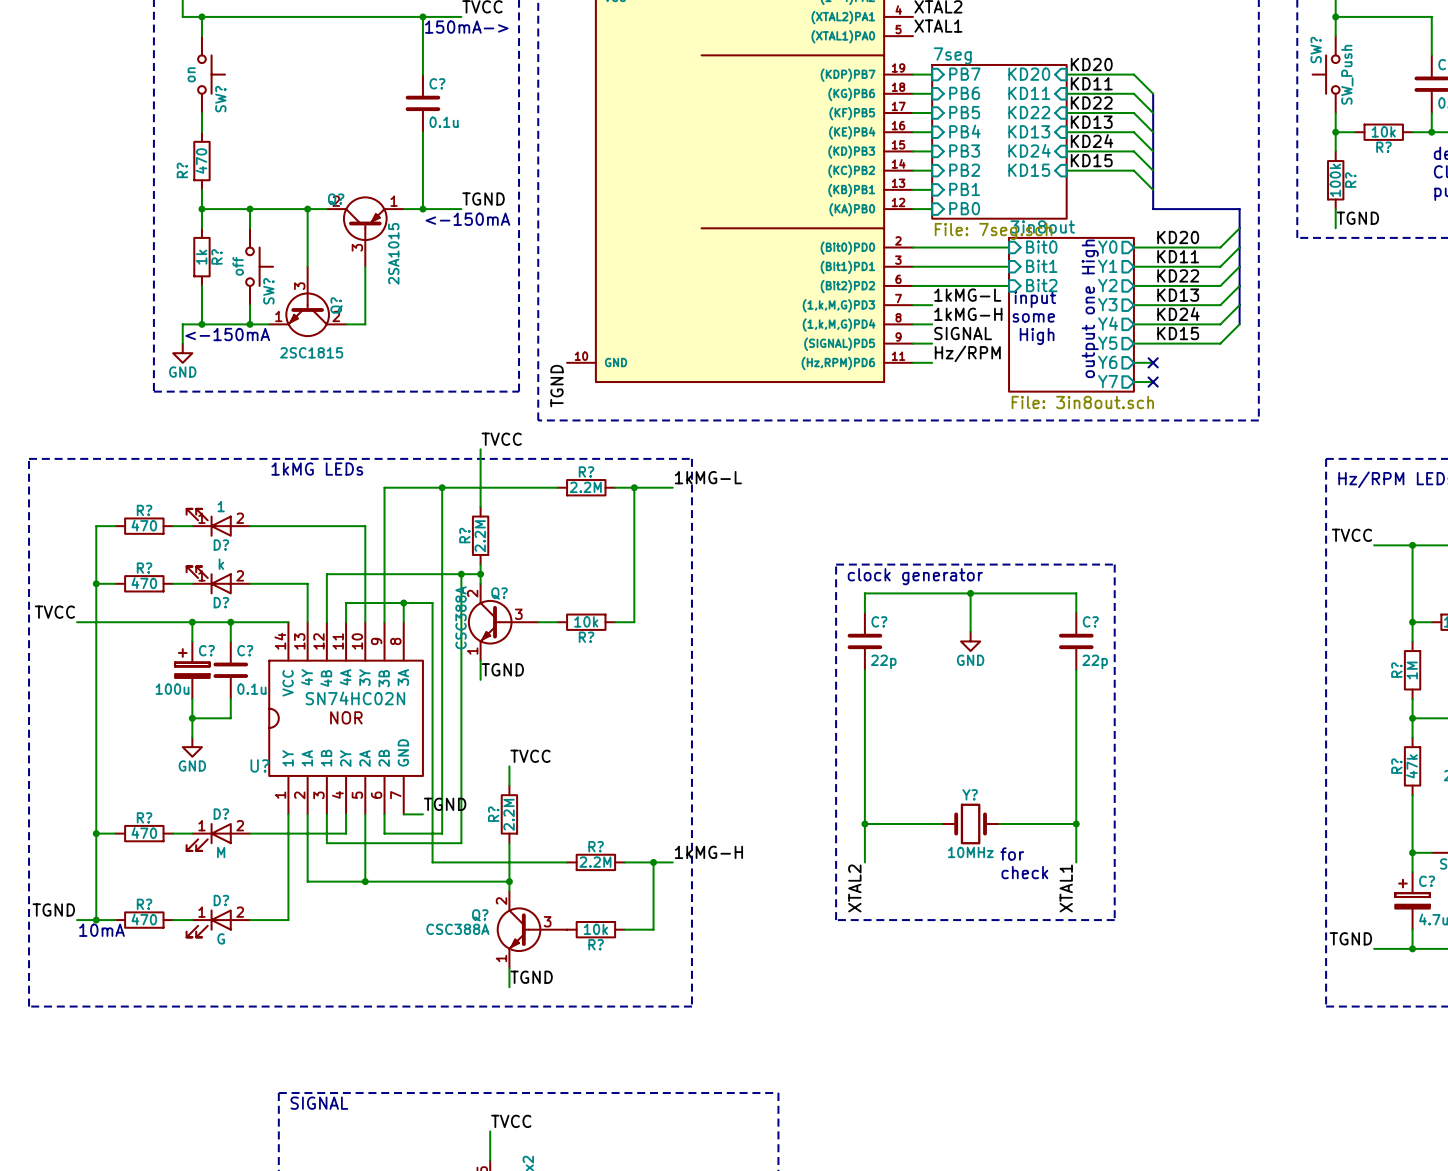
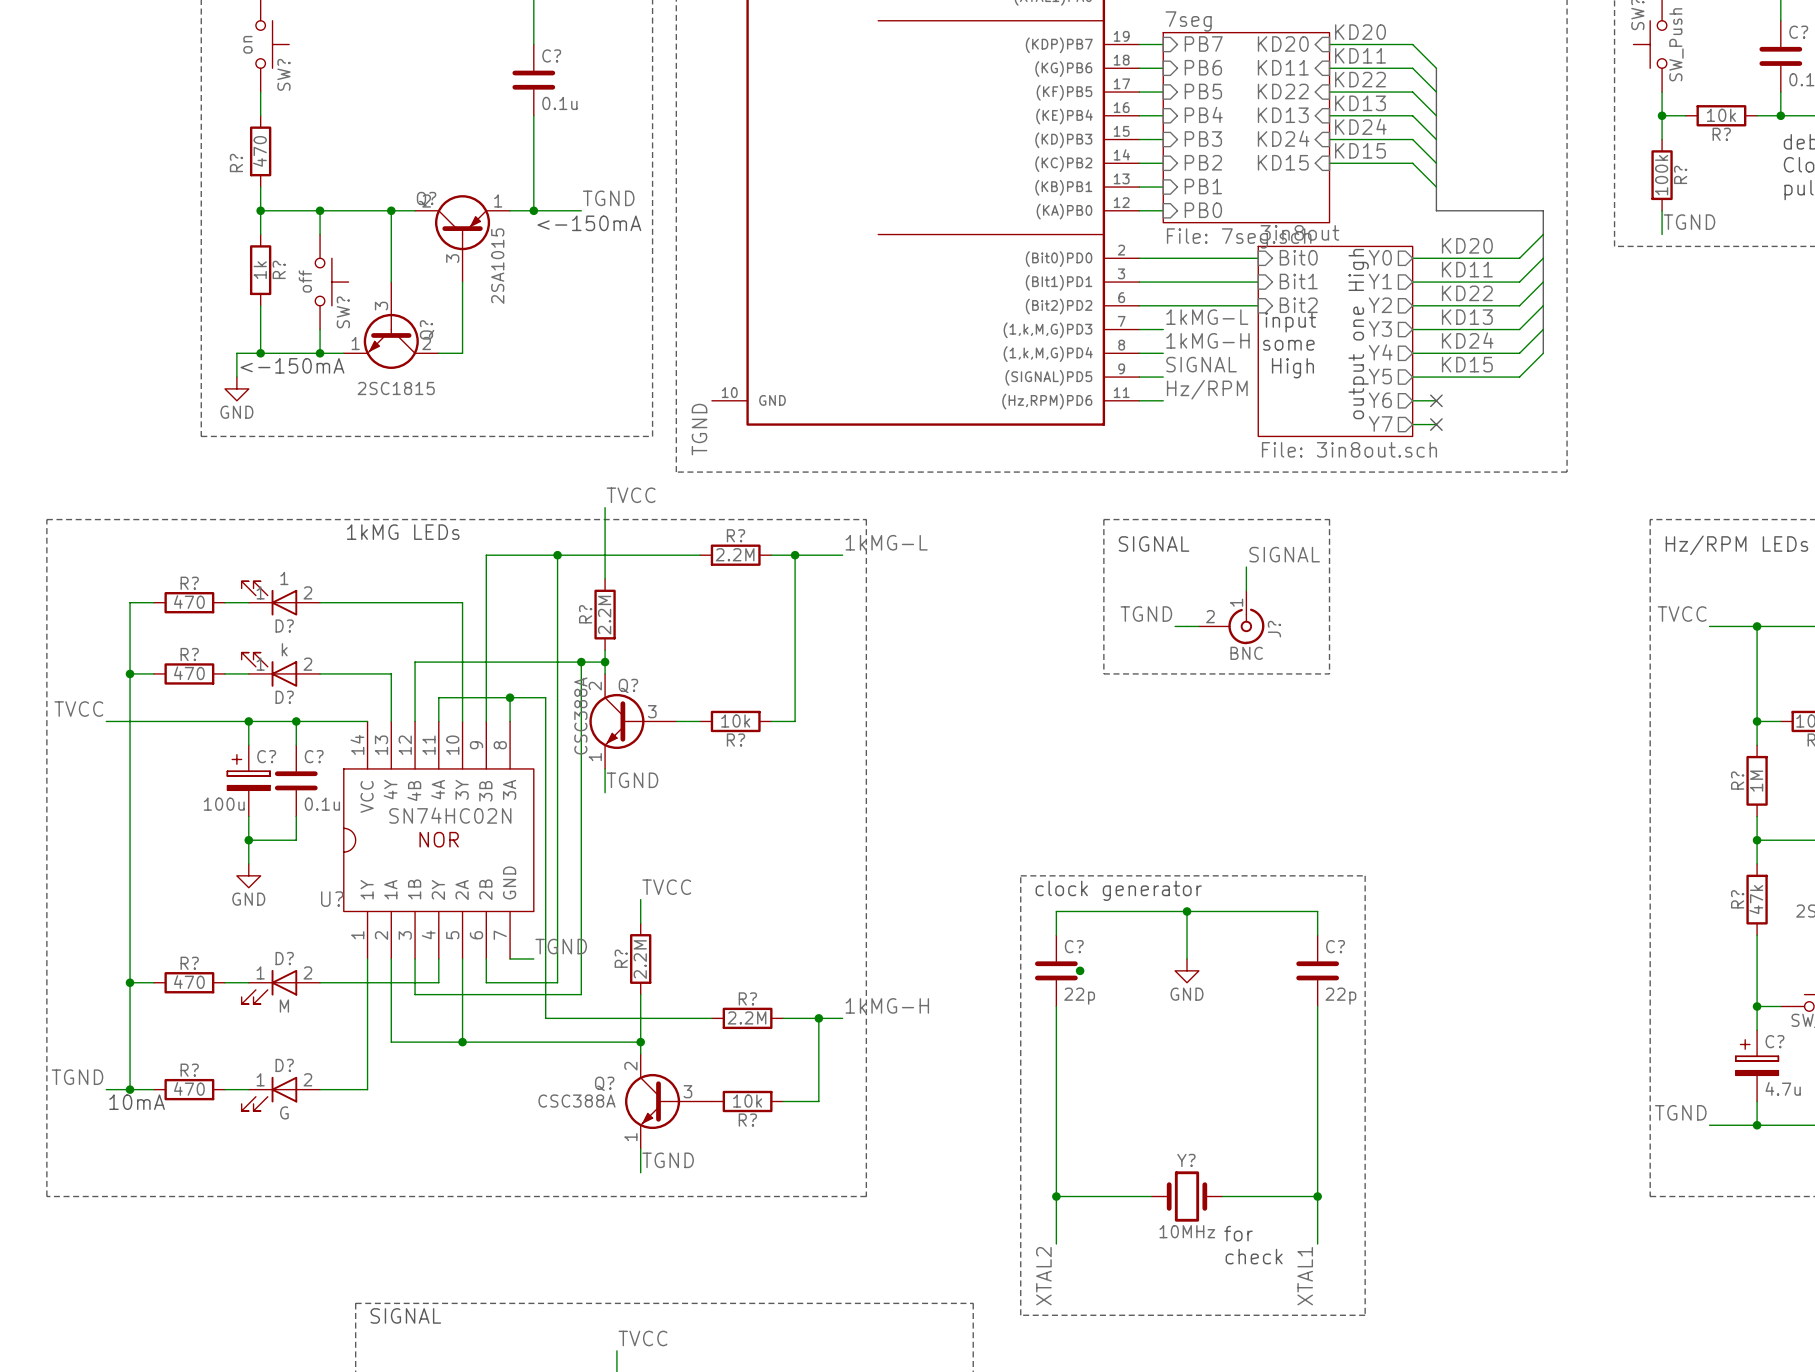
line: none -> (1103, 519) (1329, 519) (1329, 673) (1103, 673) (1103, 519)
text: none -> SIGNAL (1154, 543)
label: none -> SIGNAL (1284, 554)
wire: none -> (1246, 567) (1246, 590)
label: none -> TGND (1146, 614)
J?: none -> BNC (1231, 617)
wire: none -> (1175, 626) (1198, 626)
line: (836, 564) (1114, 564) (1114, 920) (836, 920) (836, 564) -> (1020, 875) (1365, 875) (1365, 1315) (1020, 1315) (1020, 875)
text position: clock generator (915, 576) -> clock generator (1118, 890)
wire: (970, 593) (970, 631) -> (1187, 911) (1187, 958)
junction: (970, 593) -> none
wire: (864, 612) (864, 593) (1076, 593) (1076, 612) -> (1056, 935) (1056, 911) (1317, 911) (1317, 935)
C?: 22p (864, 641) -> none
power symbol position: GND (970, 641) -> GND (1187, 970)
C?: 22p (1076, 641) -> none
wire: (864, 670) (864, 862) -> (1056, 1006) (1056, 1244)
wire: (1076, 670) (1076, 862) -> (1317, 1006) (1317, 1244)
junction: none -> (1187, 911)
C?: none -> 22p (1056, 970)
wire: (864, 823) (941, 823) -> (1056, 1196) (1151, 1196)
Y? position: (970, 823) -> (1187, 1196)
wire: (999, 823) (1076, 823) -> (1222, 1196) (1317, 1196)
C?: none -> 22p (1317, 970)
junction: (1076, 823) -> none
text position: for (1012, 854) -> for (1238, 1233)
text position: check (1024, 872) -> check (1254, 1256)
label position: XTAL2 (854, 888) -> XTAL2 (1043, 1276)
label position: XTAL1 (1066, 888) -> XTAL1 (1305, 1276)
junction: none -> (1056, 1196)
junction: none -> (1317, 1196)

